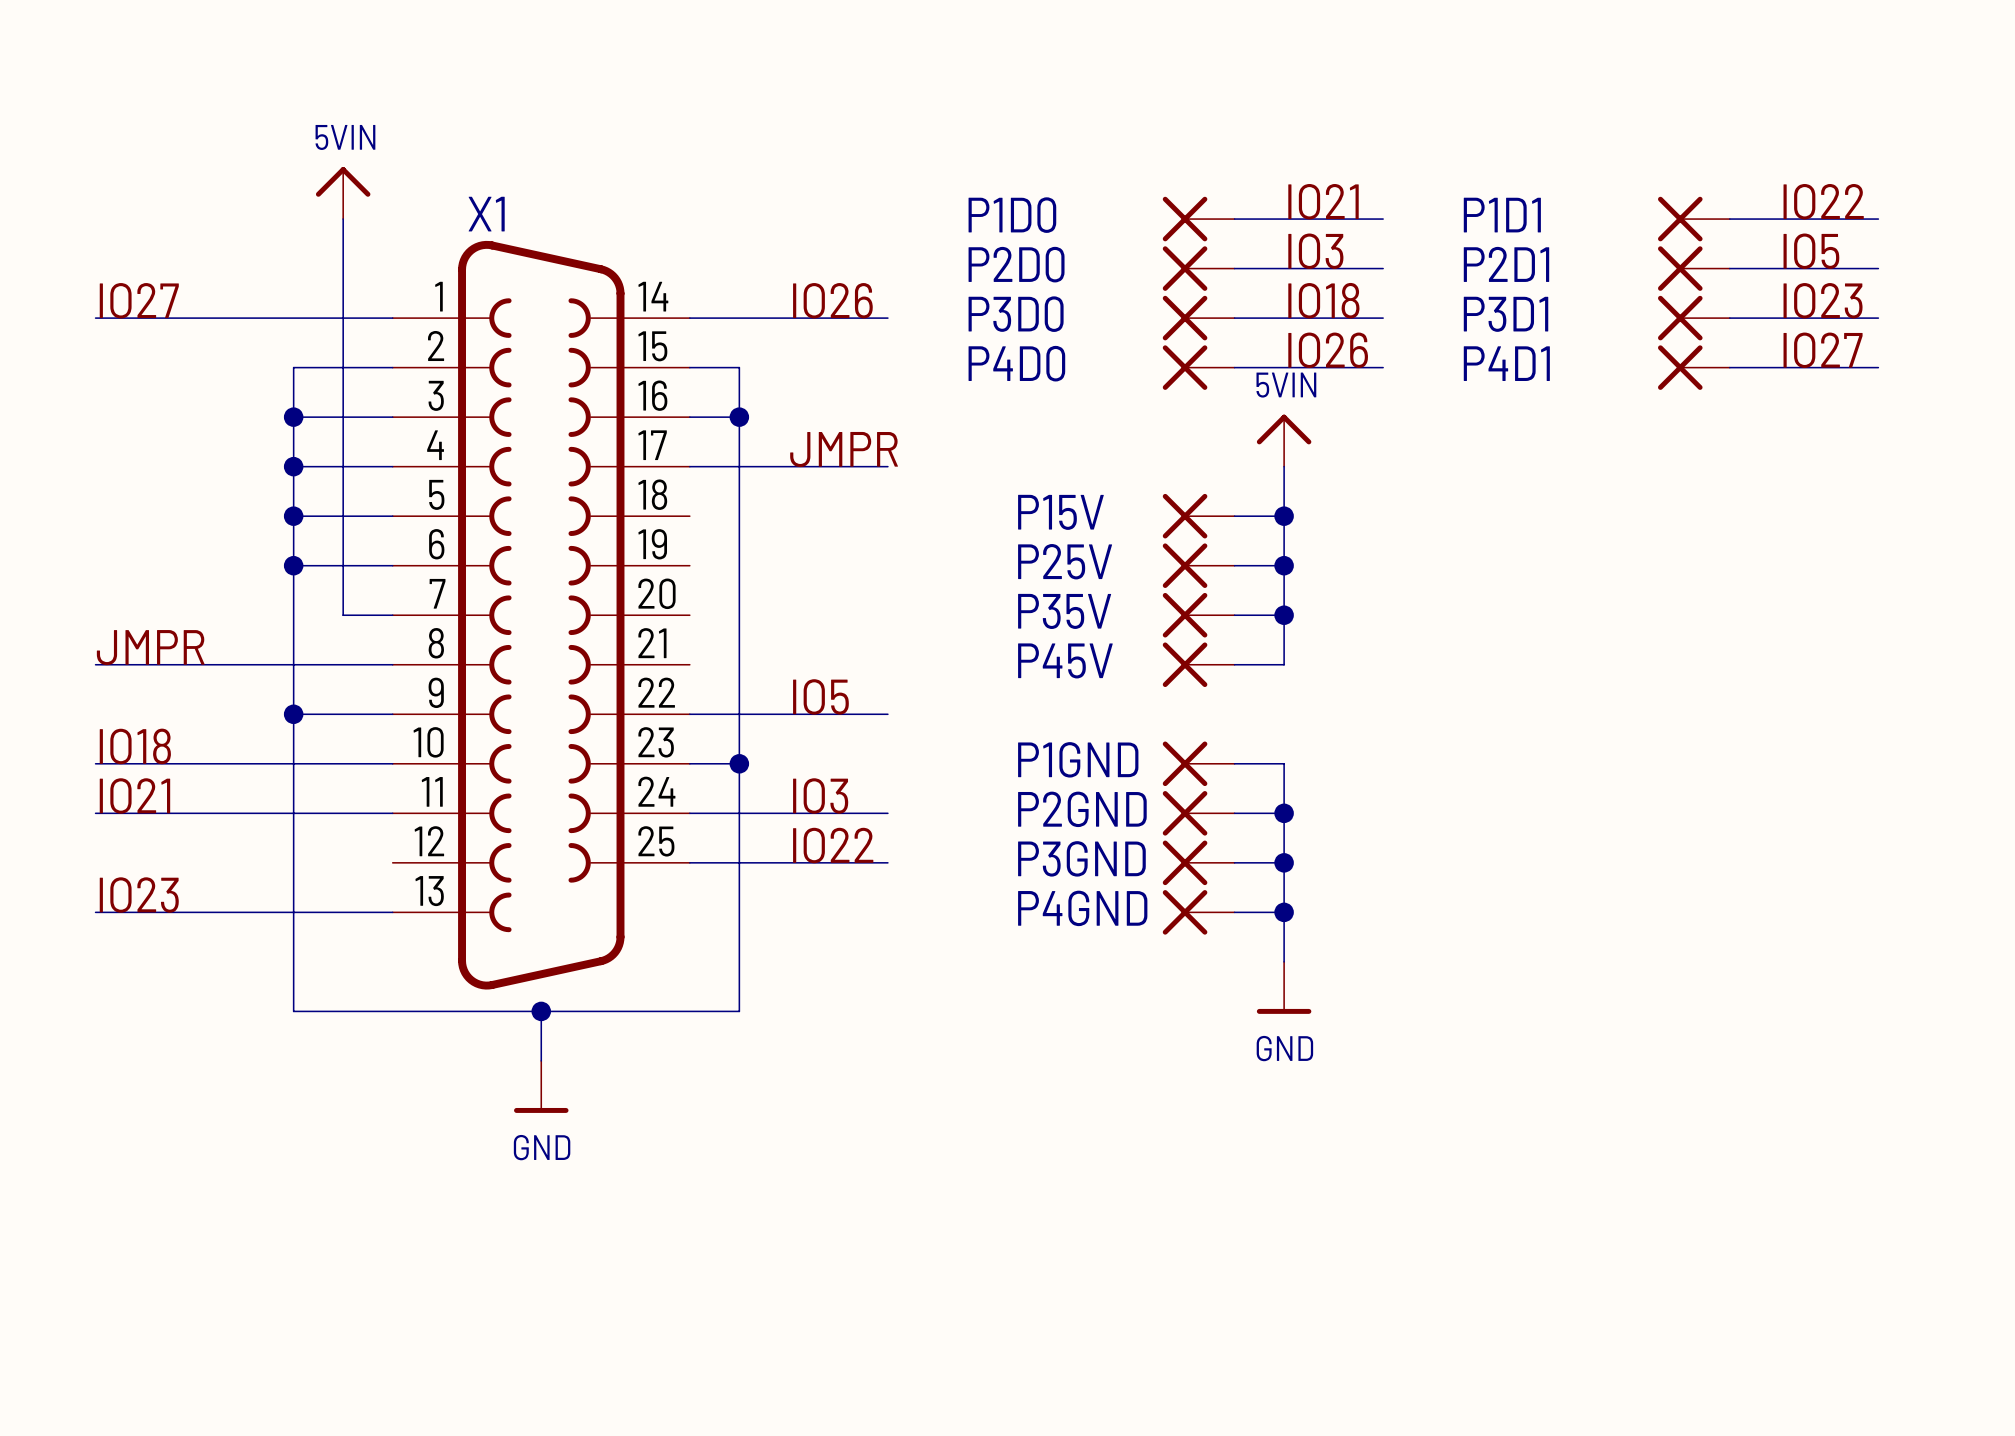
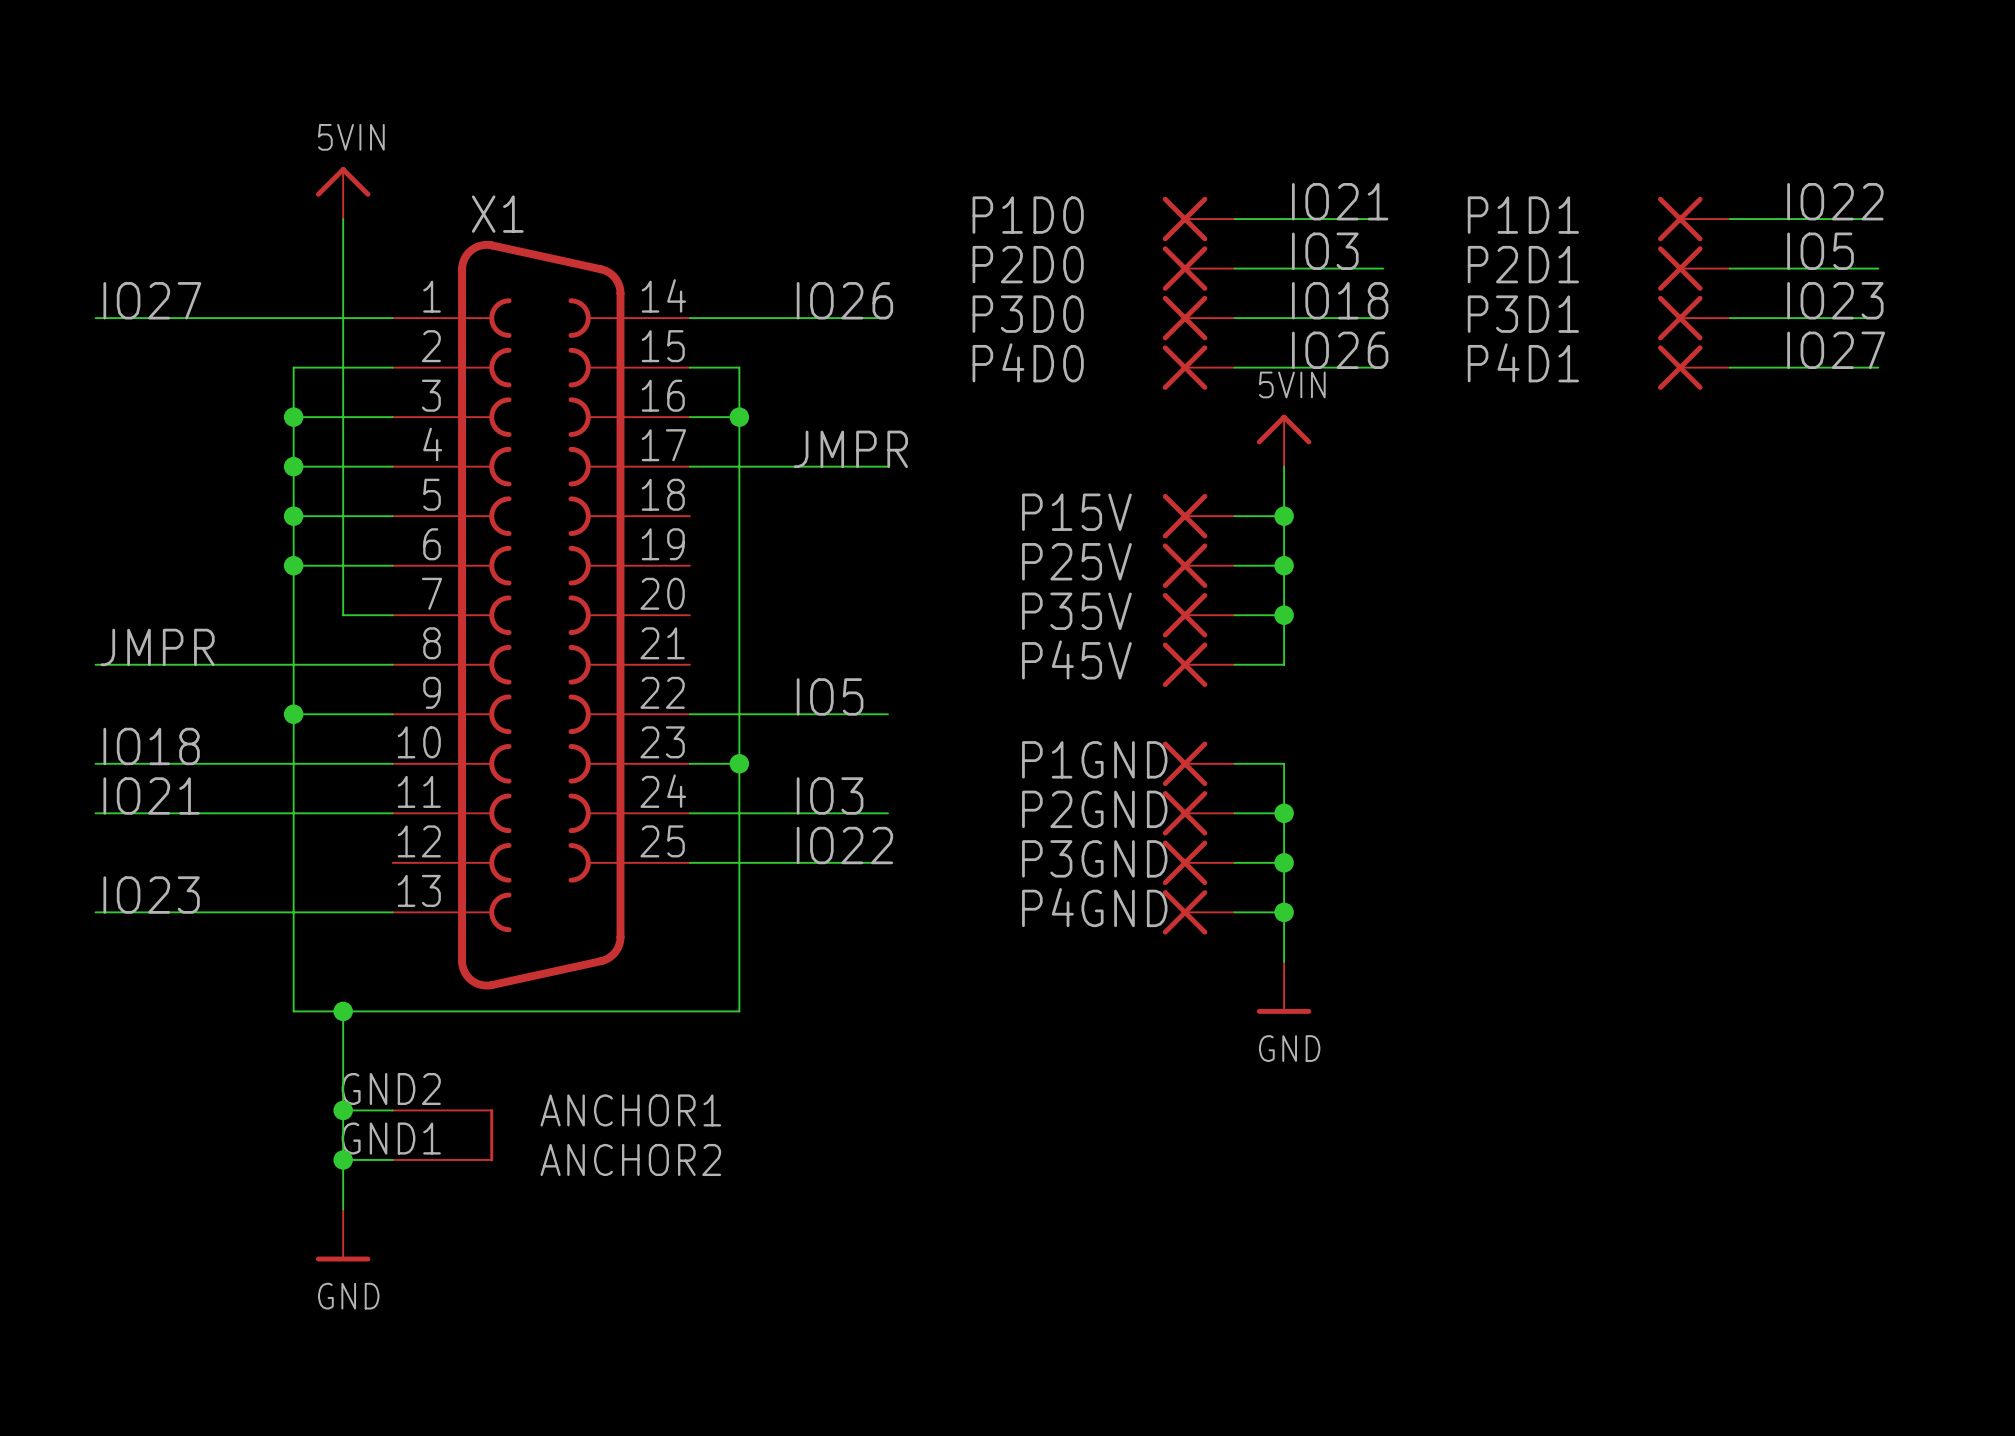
X1 symbol: [392, 240, 690, 990] -> [392, 240, 690, 1162]
wire: none -> (343, 1011) (343, 1209)
junction: none -> (343, 1011)
wire: (541, 1011) (541, 1060) -> none
junction: (541, 1011) -> none
power symbol position: GND (541, 1086) -> GND (343, 1235)
wire: none -> (343, 1110) (392, 1110)
junction: none -> (343, 1110)
wire: none -> (343, 1159) (392, 1159)
junction: none -> (343, 1159)

